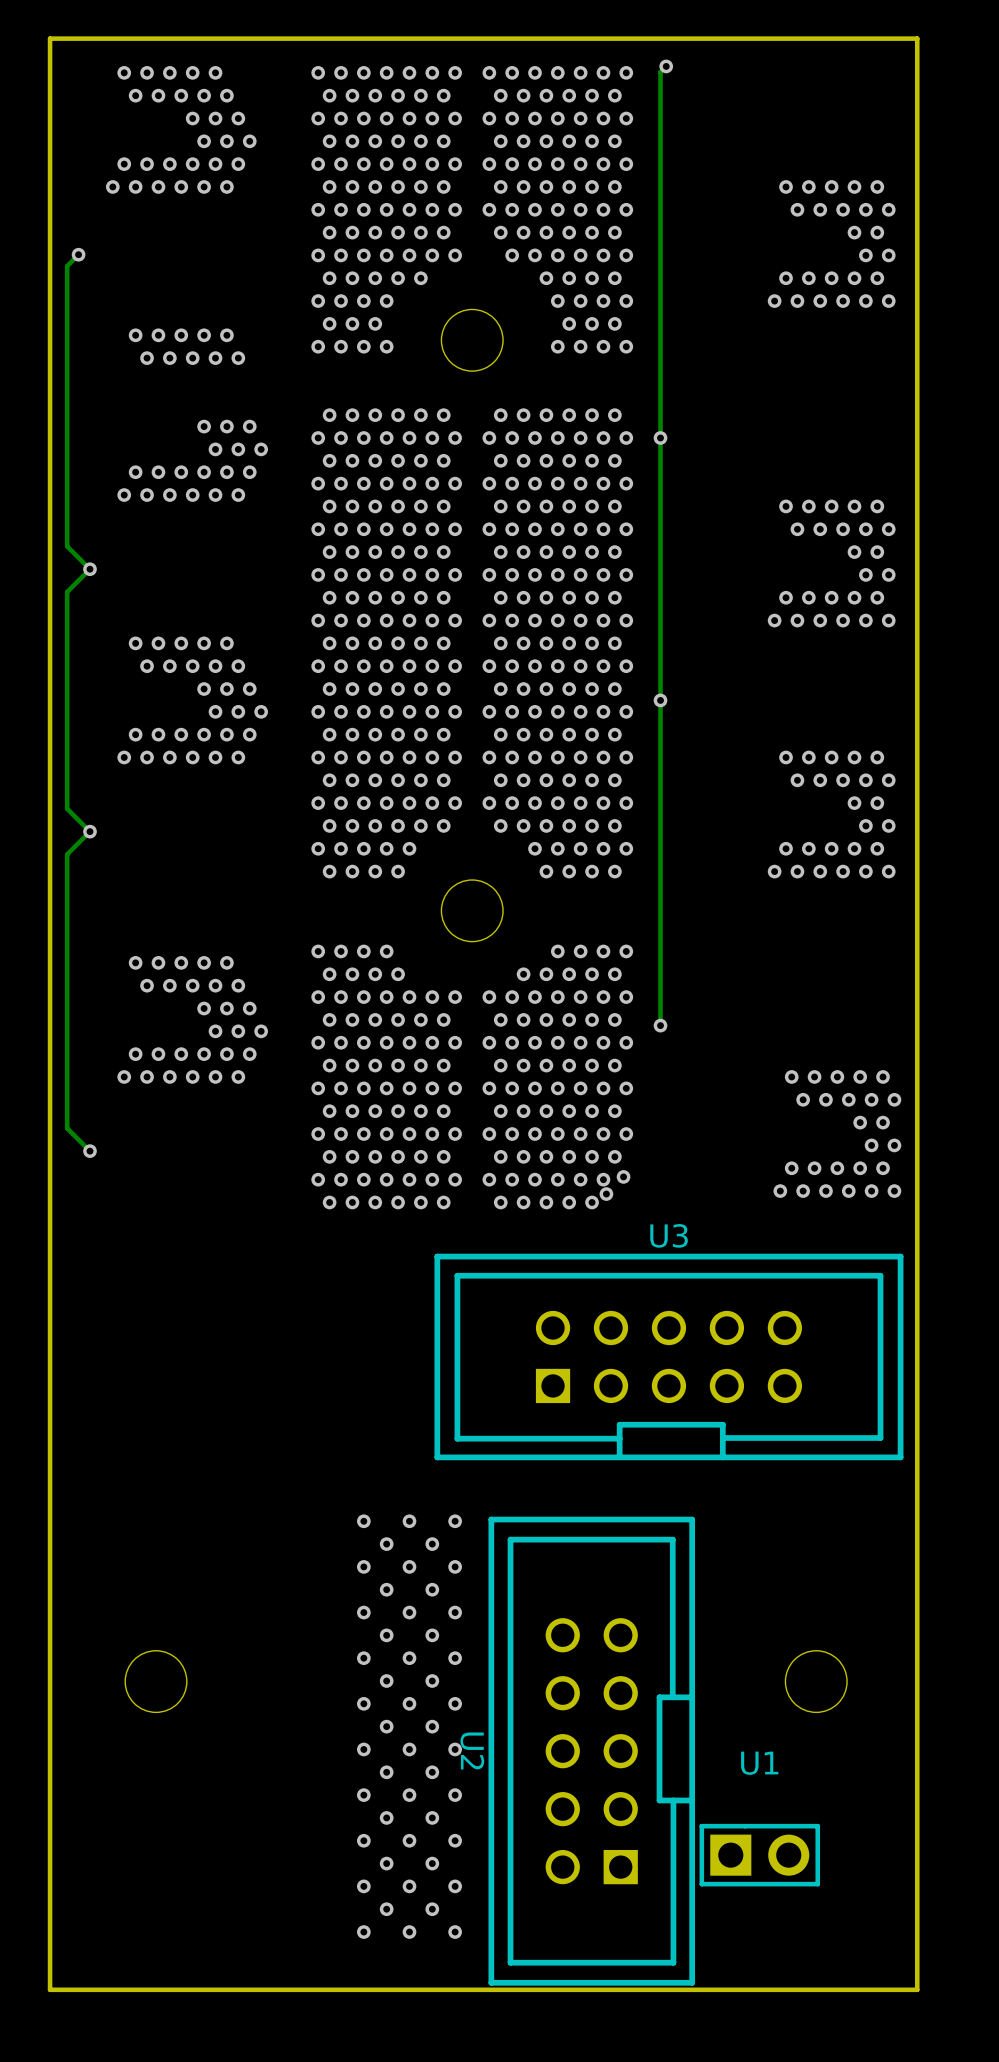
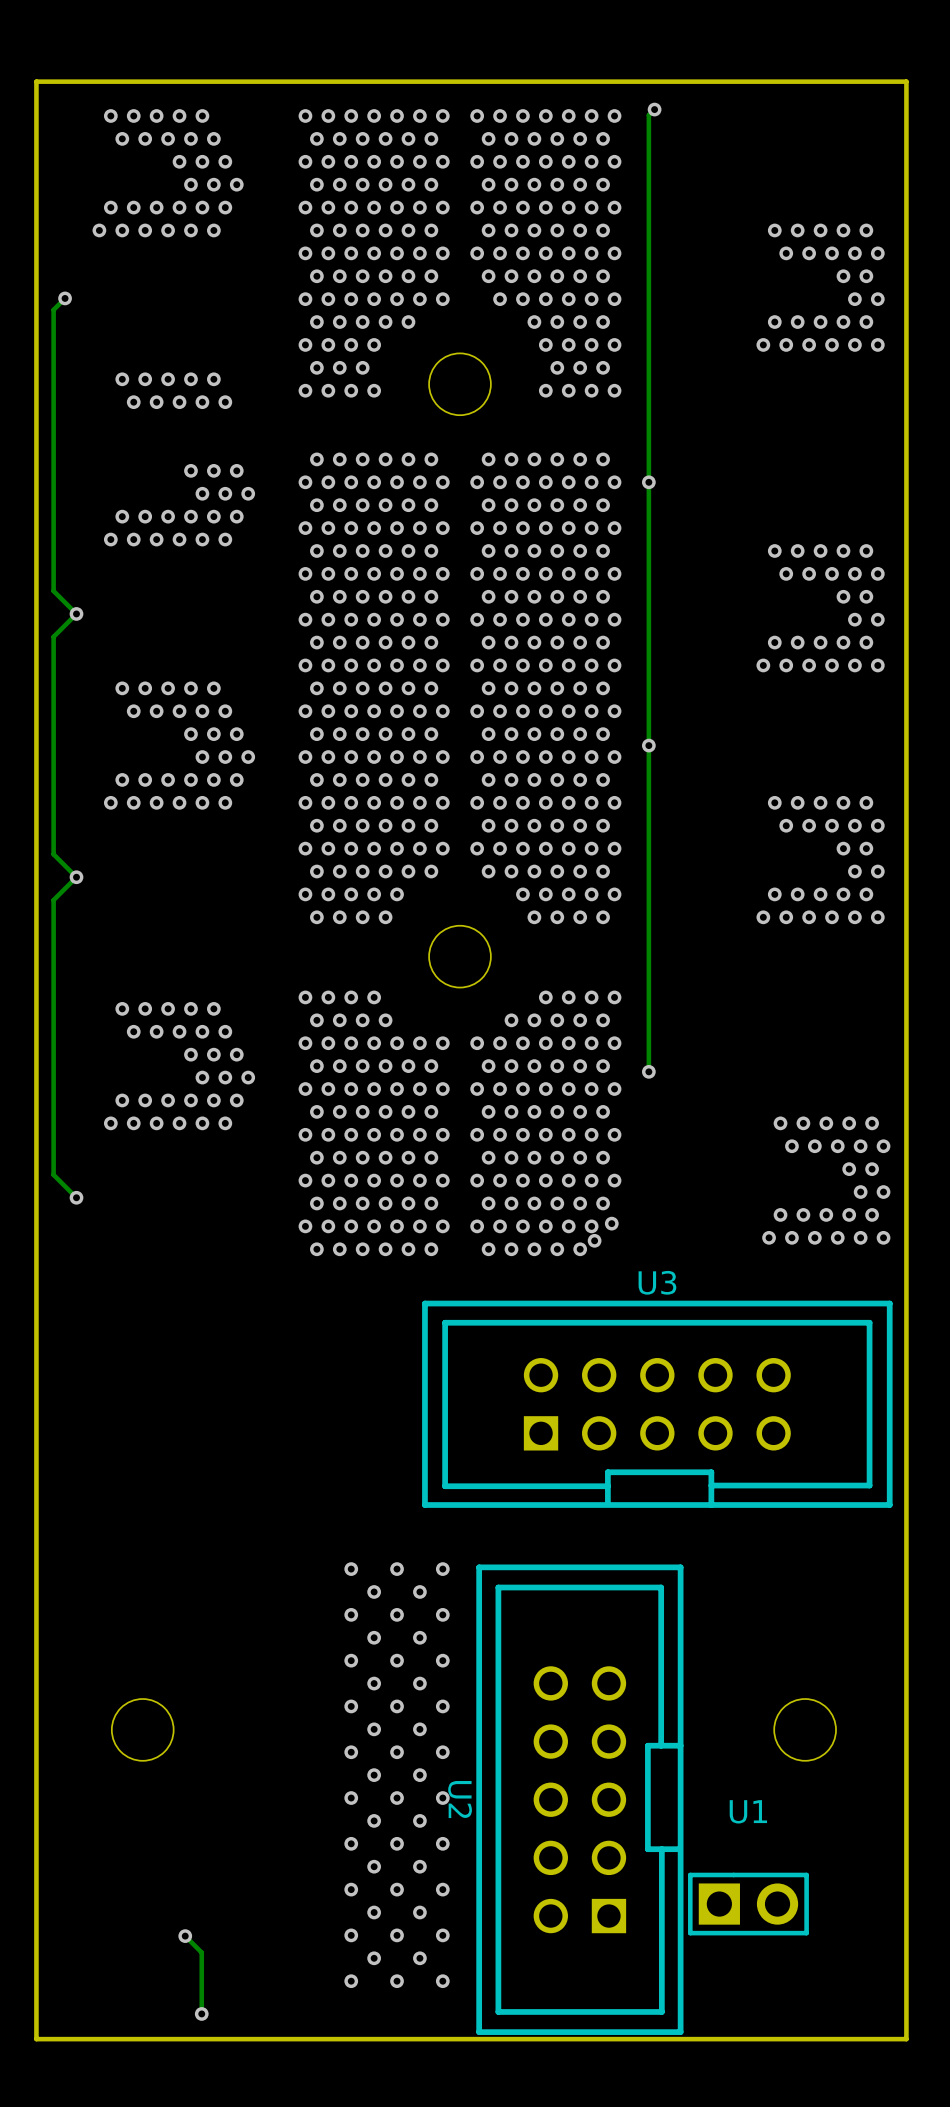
track: none -> (185, 1936) (201, 1952) (201, 2013)
via: none -> (185, 1936)
via: none -> (201, 2013)

